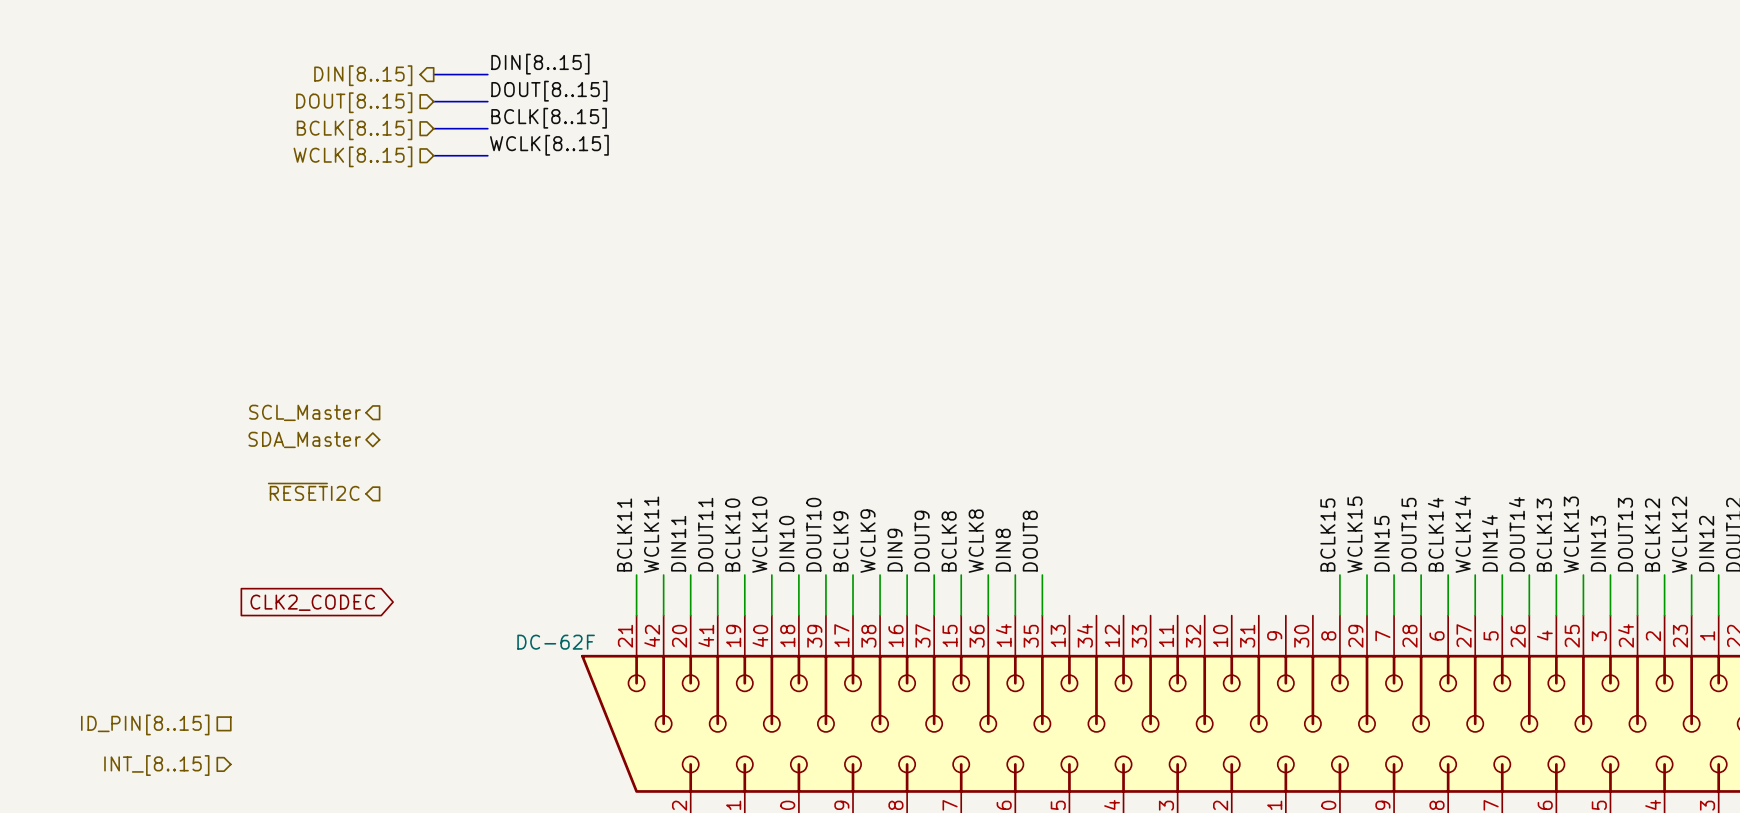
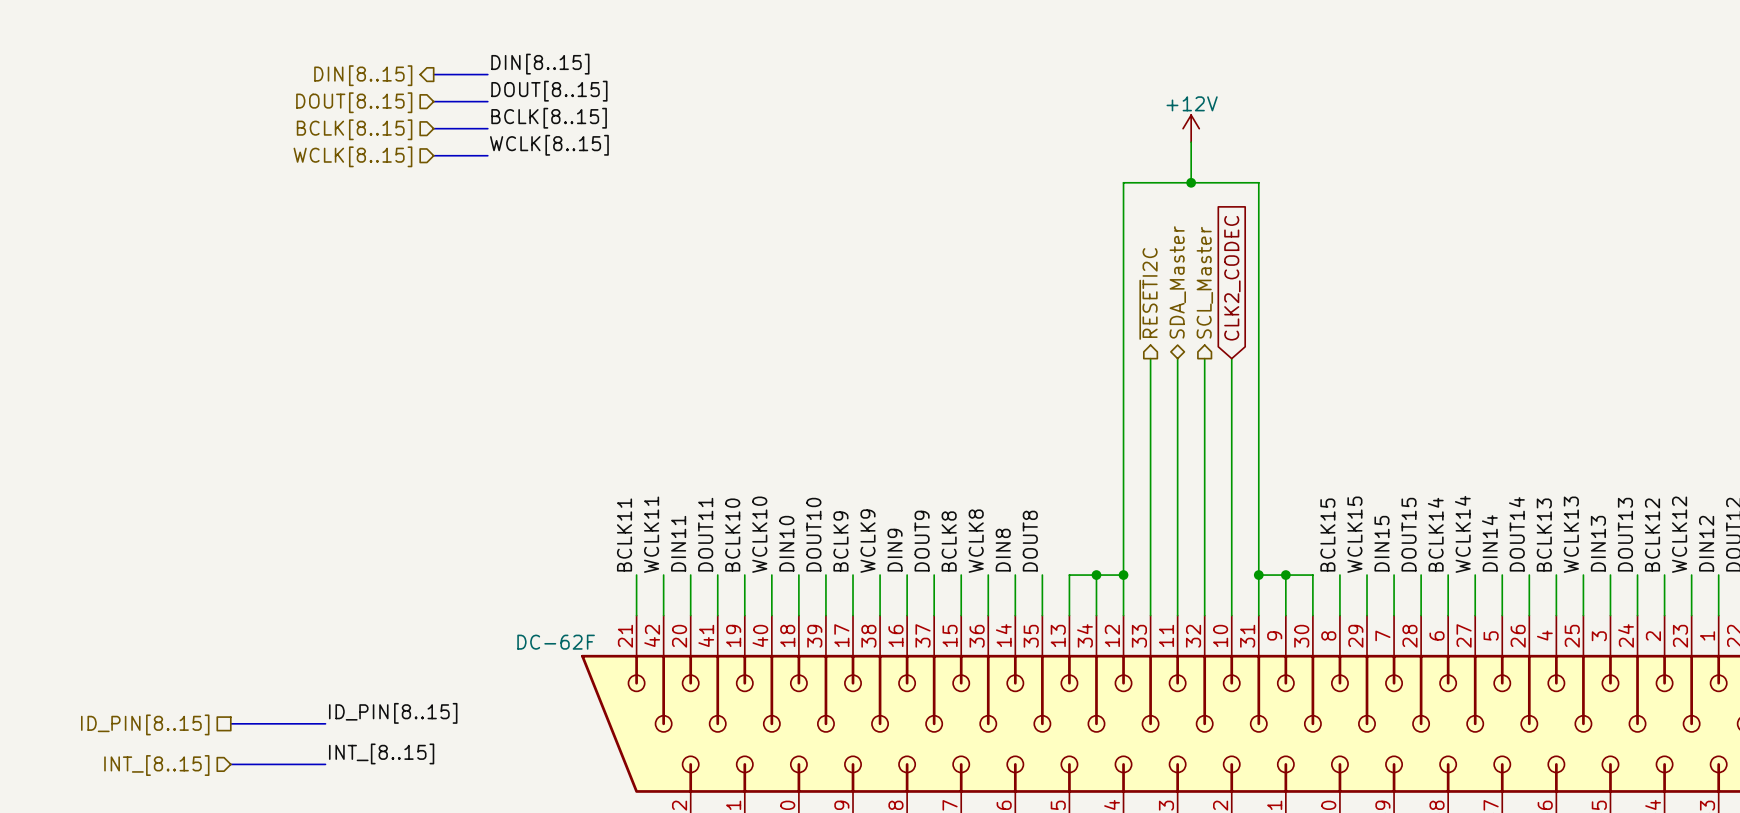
power symbol: none -> +12V (1191, 128)
wire: none -> (1191, 142) (1191, 182)
junction: none -> (1191, 182)
global label: none -> CLK2_CODEC (1232, 278)
hierarchical label: none -> SDA_Master (1177, 282)
hierarchical label: none -> SCL_Master (1204, 282)
hierarchical label: none -> ~{RESET}I2C (1148, 293)
wire: none -> (1150, 358) (1150, 615)
wire: none -> (1177, 358) (1177, 615)
wire: none -> (1204, 358) (1204, 615)
wire: none -> (1231, 358) (1231, 615)
hierarchical label: SCL_Master (304, 412) -> none
hierarchical label: SDA_Master (304, 439) -> none
hierarchical label: ~{RESET}I2C (313, 491) -> none
wire: none -> (1096, 575) (1096, 615)
junction: none -> (1096, 575)
wire: none -> (1123, 575) (1069, 575) (1069, 615)
junction: none -> (1123, 575)
wire: none -> (1258, 575) (1312, 575) (1312, 615)
junction: none -> (1258, 575)
wire: none -> (1285, 575) (1285, 615)
junction: none -> (1285, 575)
global label: CLK2_CODEC (312, 602) -> none
wire: none -> (1123, 615) (1123, 182) (1258, 182) (1258, 615)
label: none -> ID_PIN[8..15] (393, 713)
bus: none -> (230, 723) (325, 723)
label: none -> INT_[8..15] (381, 753)
bus: none -> (230, 764) (325, 764)

